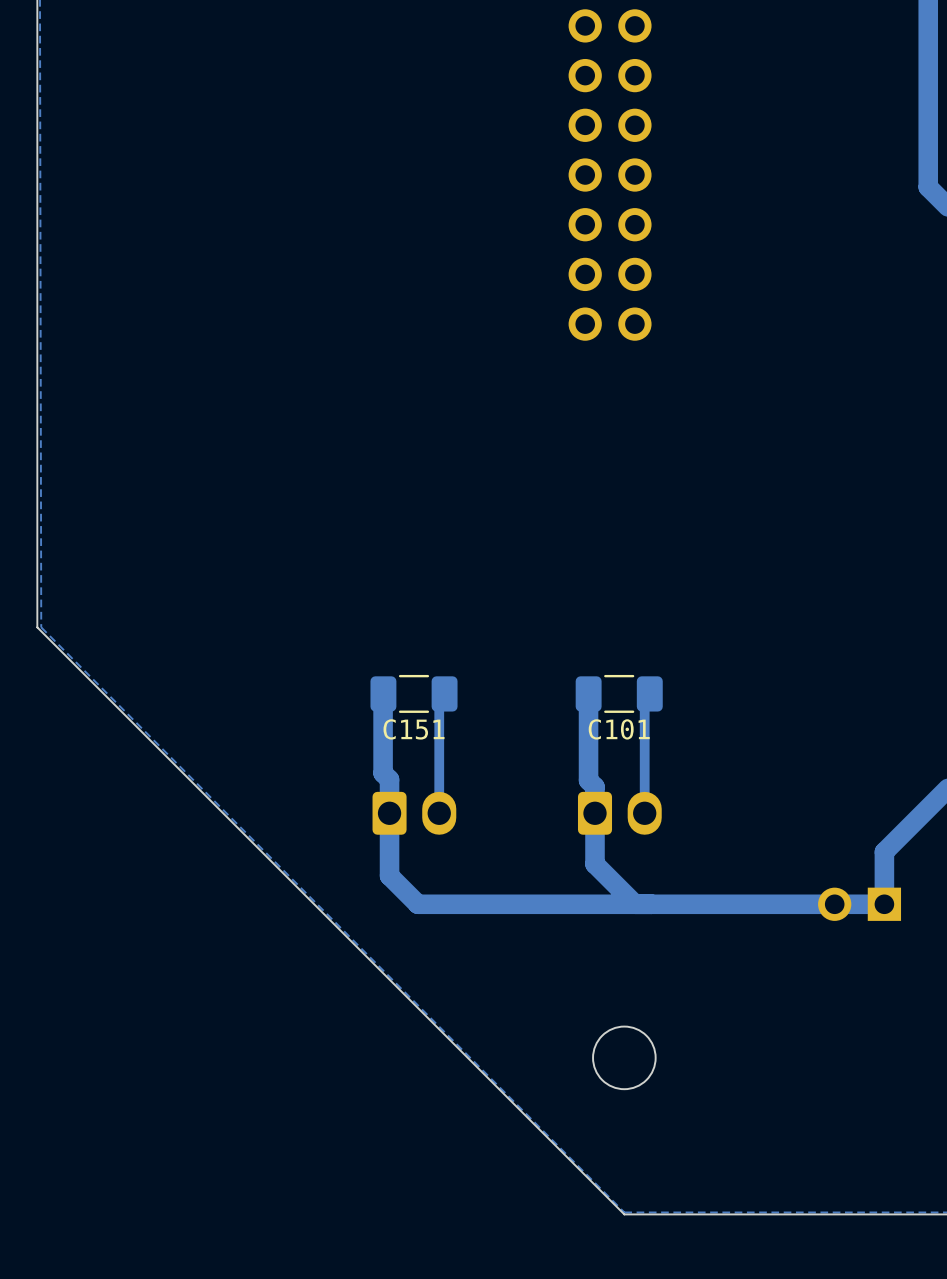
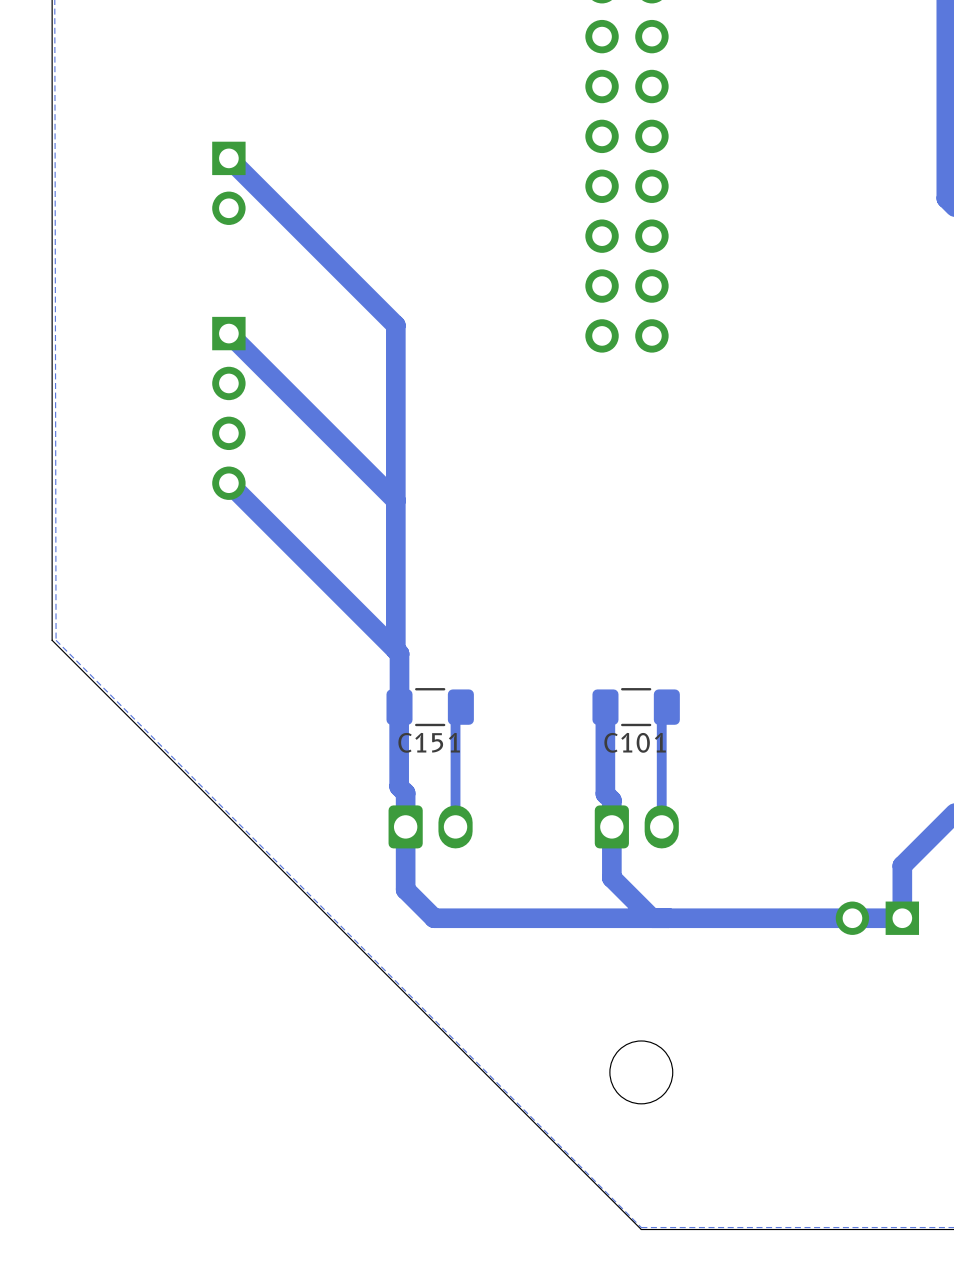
track: none -> (228, 158) (395, 325) (395, 650)
part: none -> (228, 183)
track: none -> (228, 333) (395, 500)
part: none -> (228, 408)
track: none -> (228, 483) (399, 653) (399, 707)

